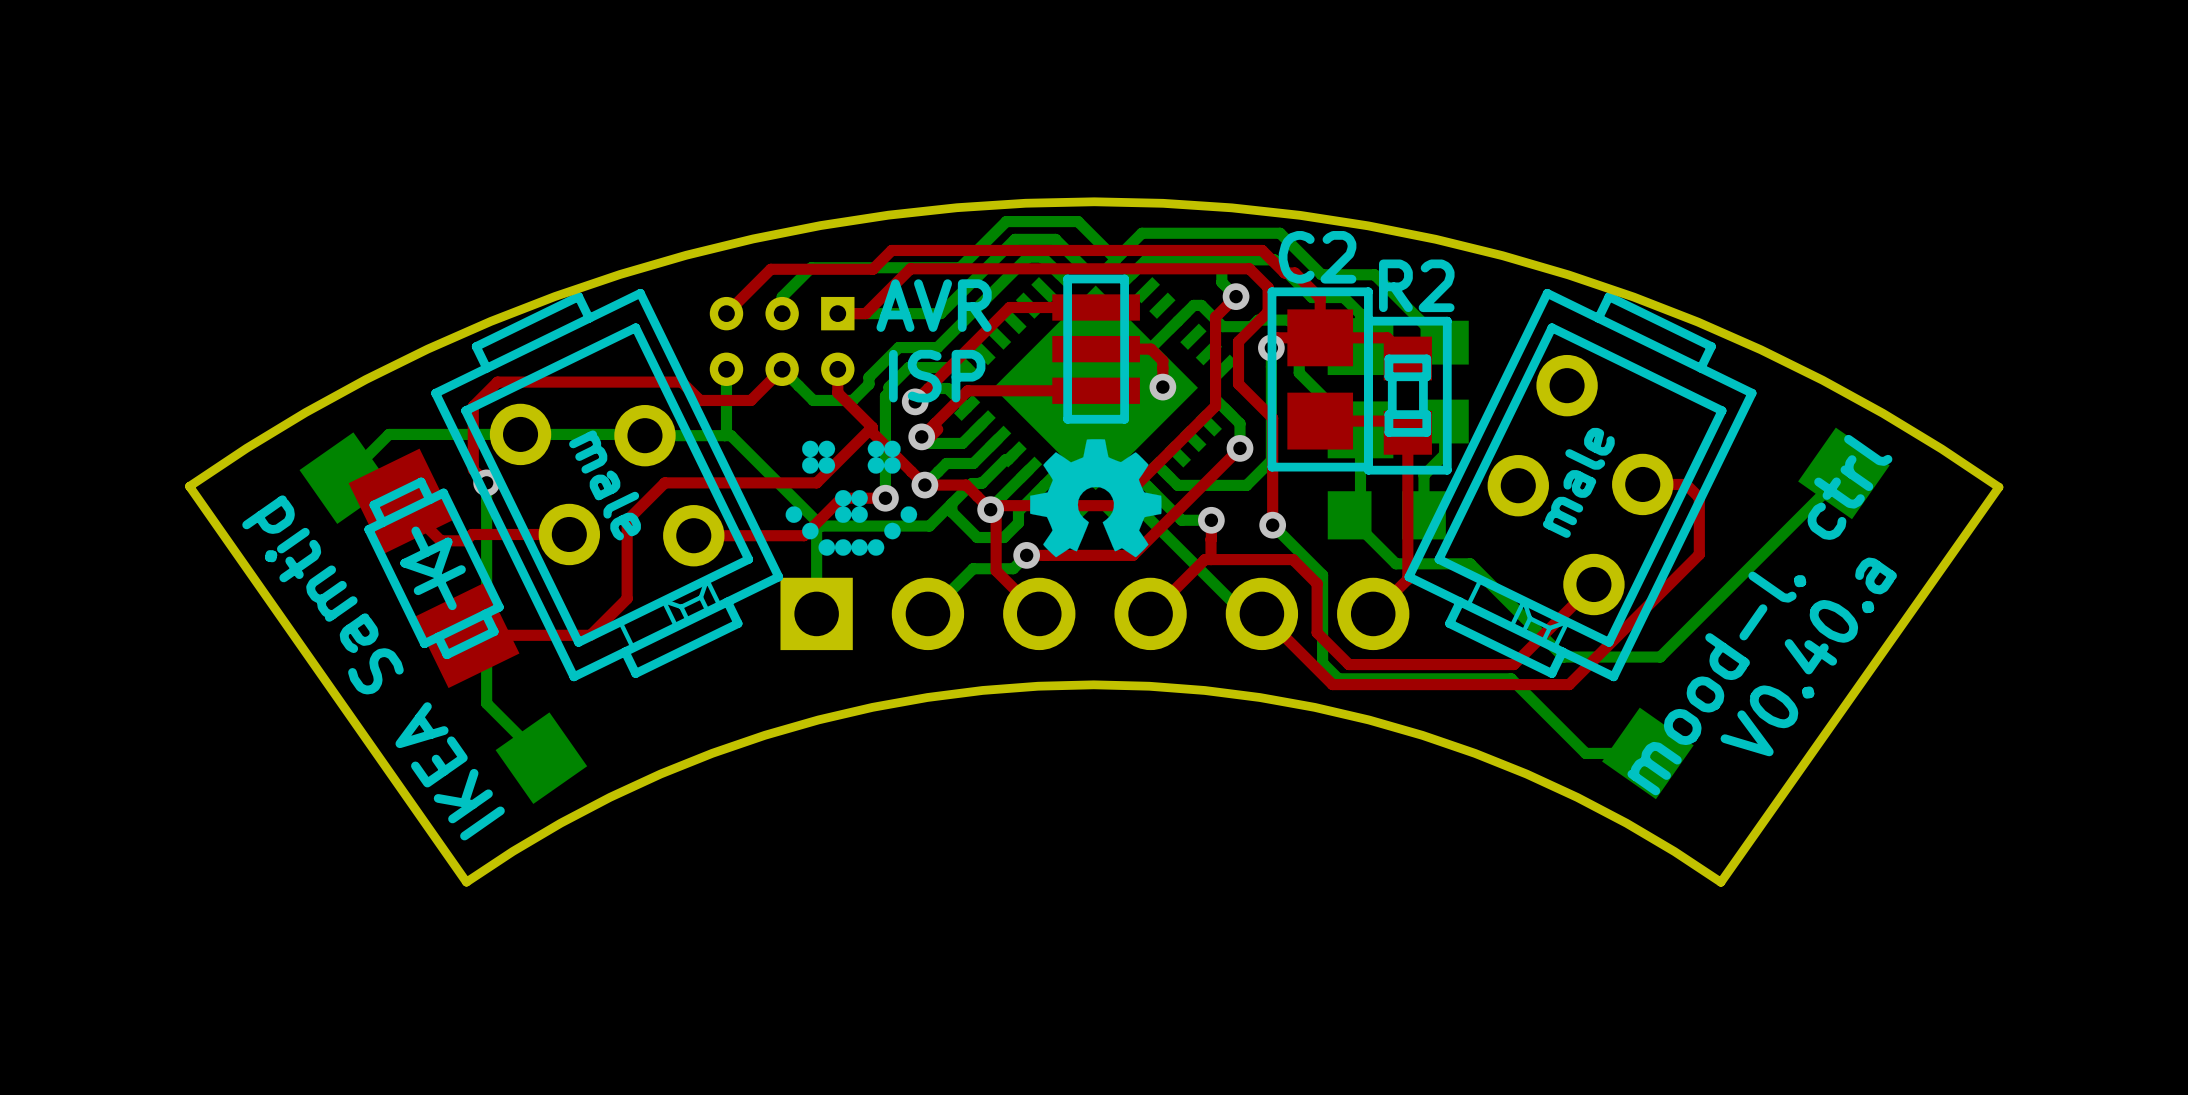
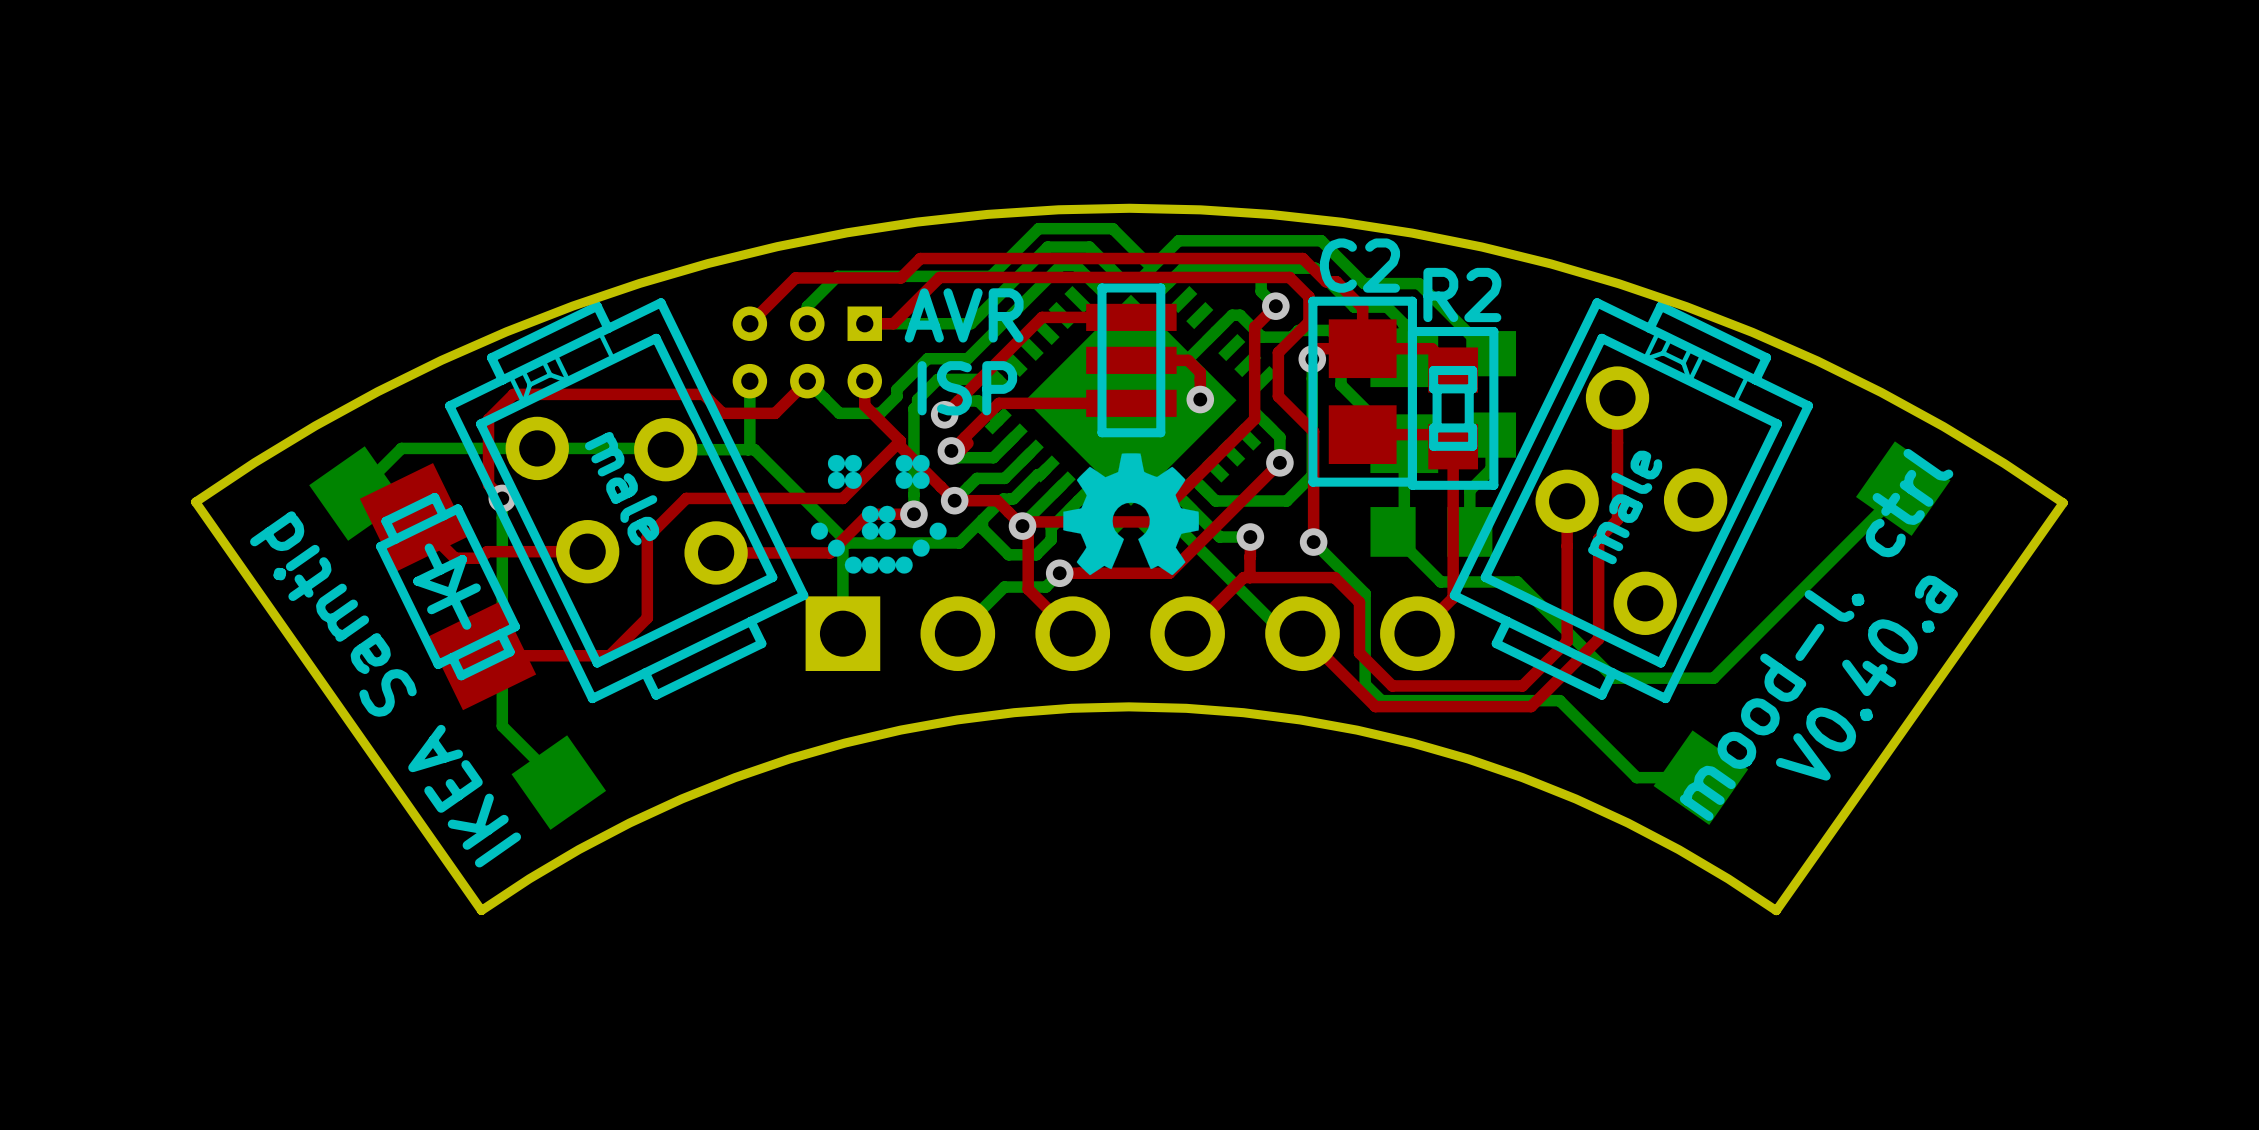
part footprint: [431, 288, 784, 682] -> [445, 298, 809, 704]
part footprint: [1404, 288, 1757, 682] -> [1449, 298, 1814, 704]
top track: (1642, 484) (1686, 484) (1699, 497) (1699, 554) (1569, 684) (1483, 684) -> (1617, 398) (1617, 519) (1598, 538) (1598, 639) (1531, 706)
top track: (1593, 584) (1513, 664) (1475, 664) -> (1567, 501) (1567, 641) (1522, 685)

